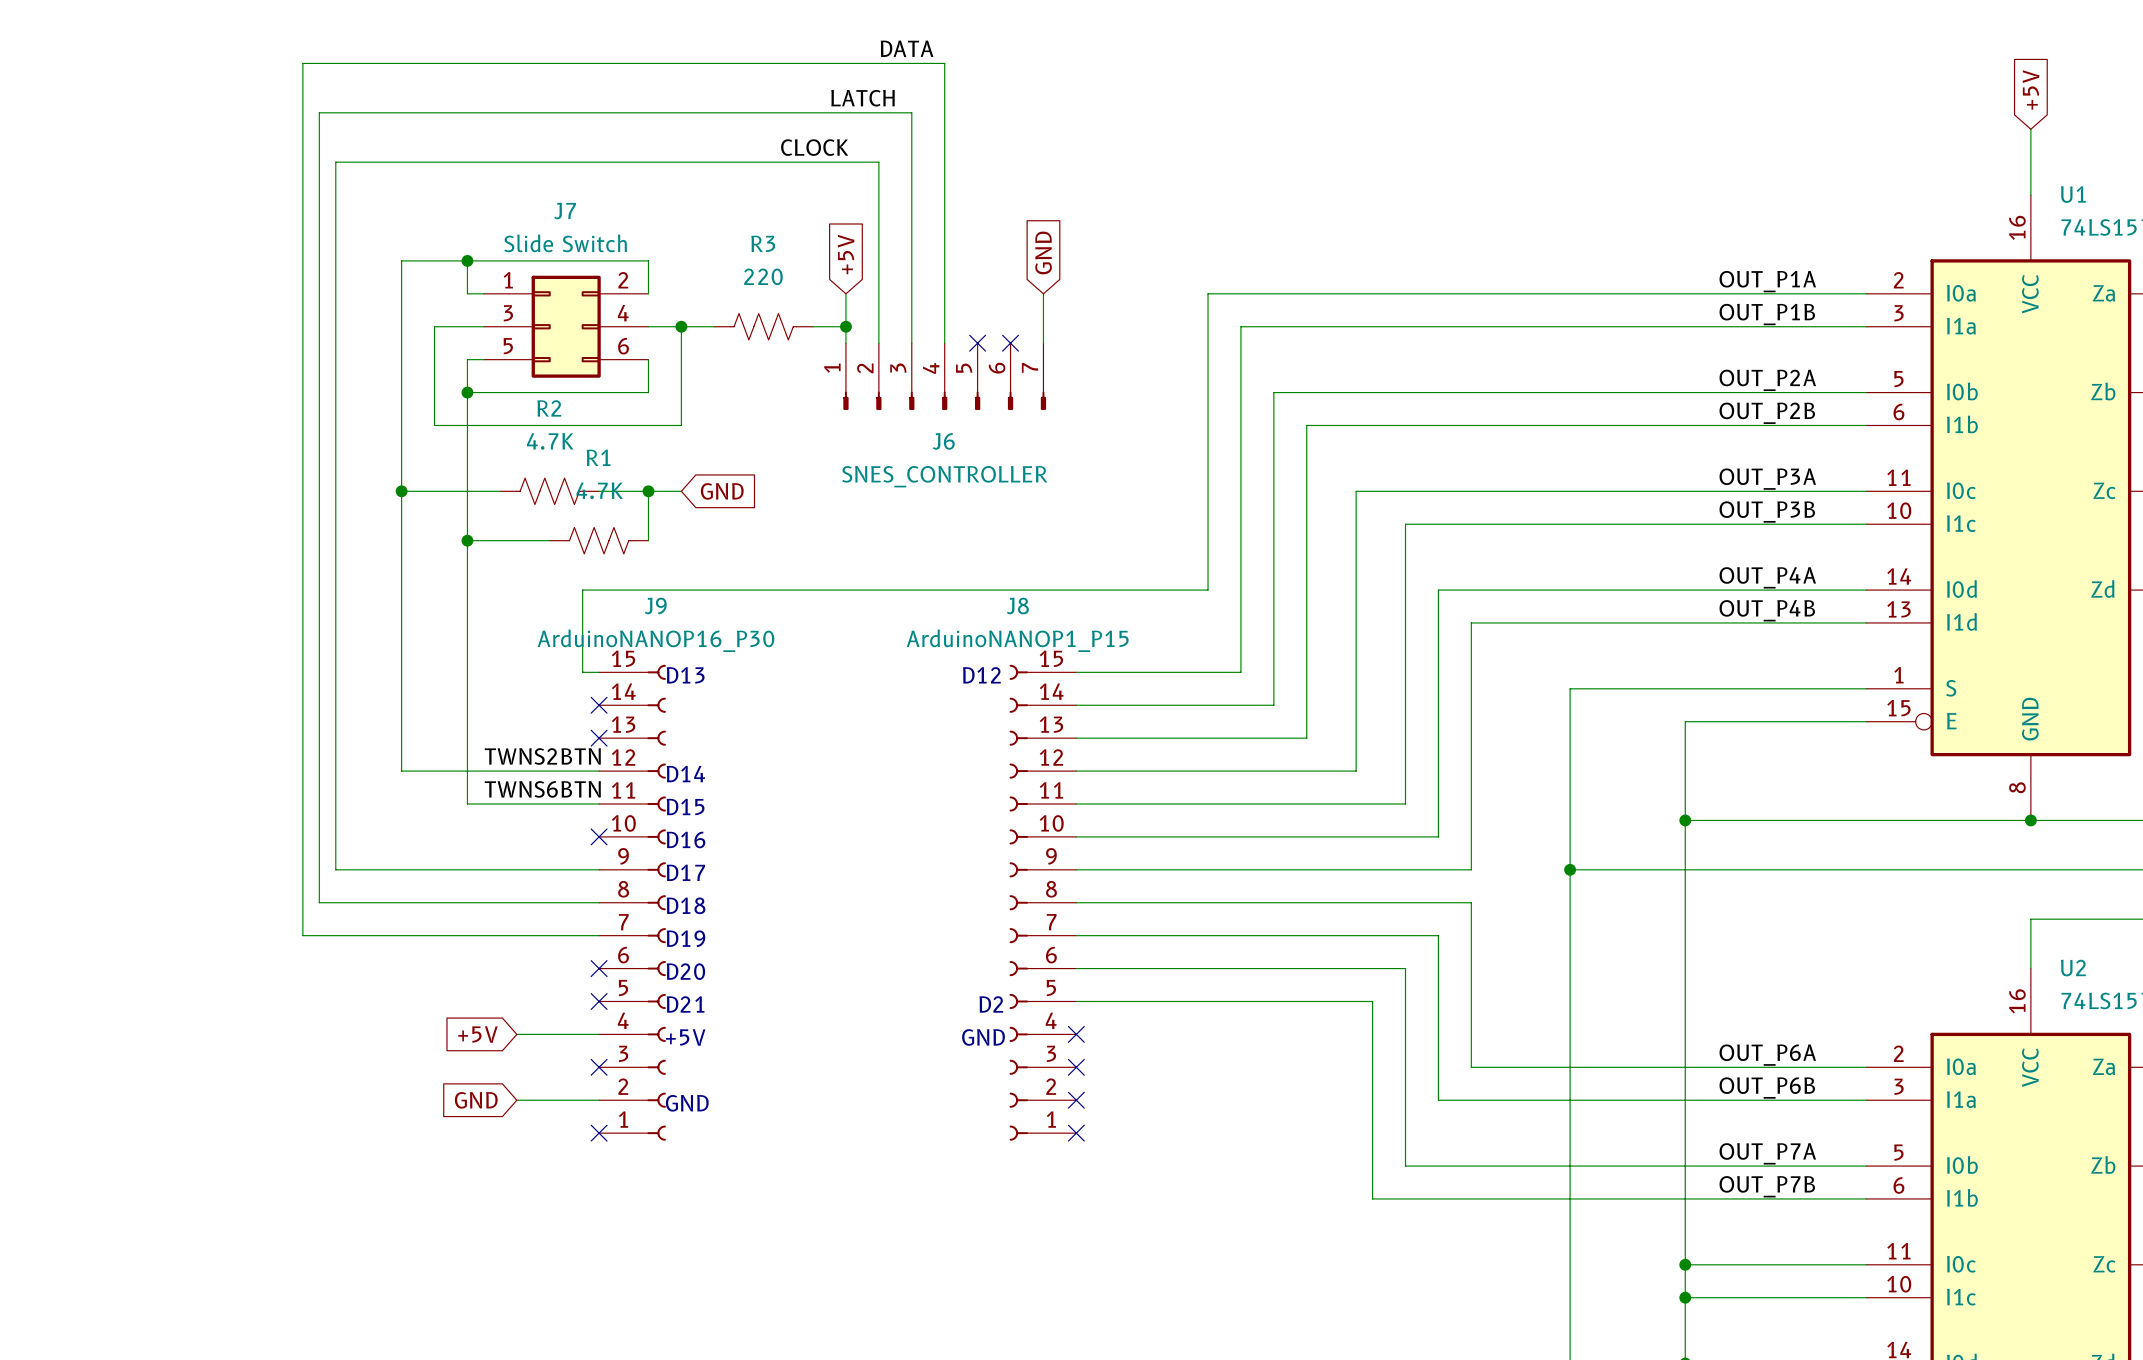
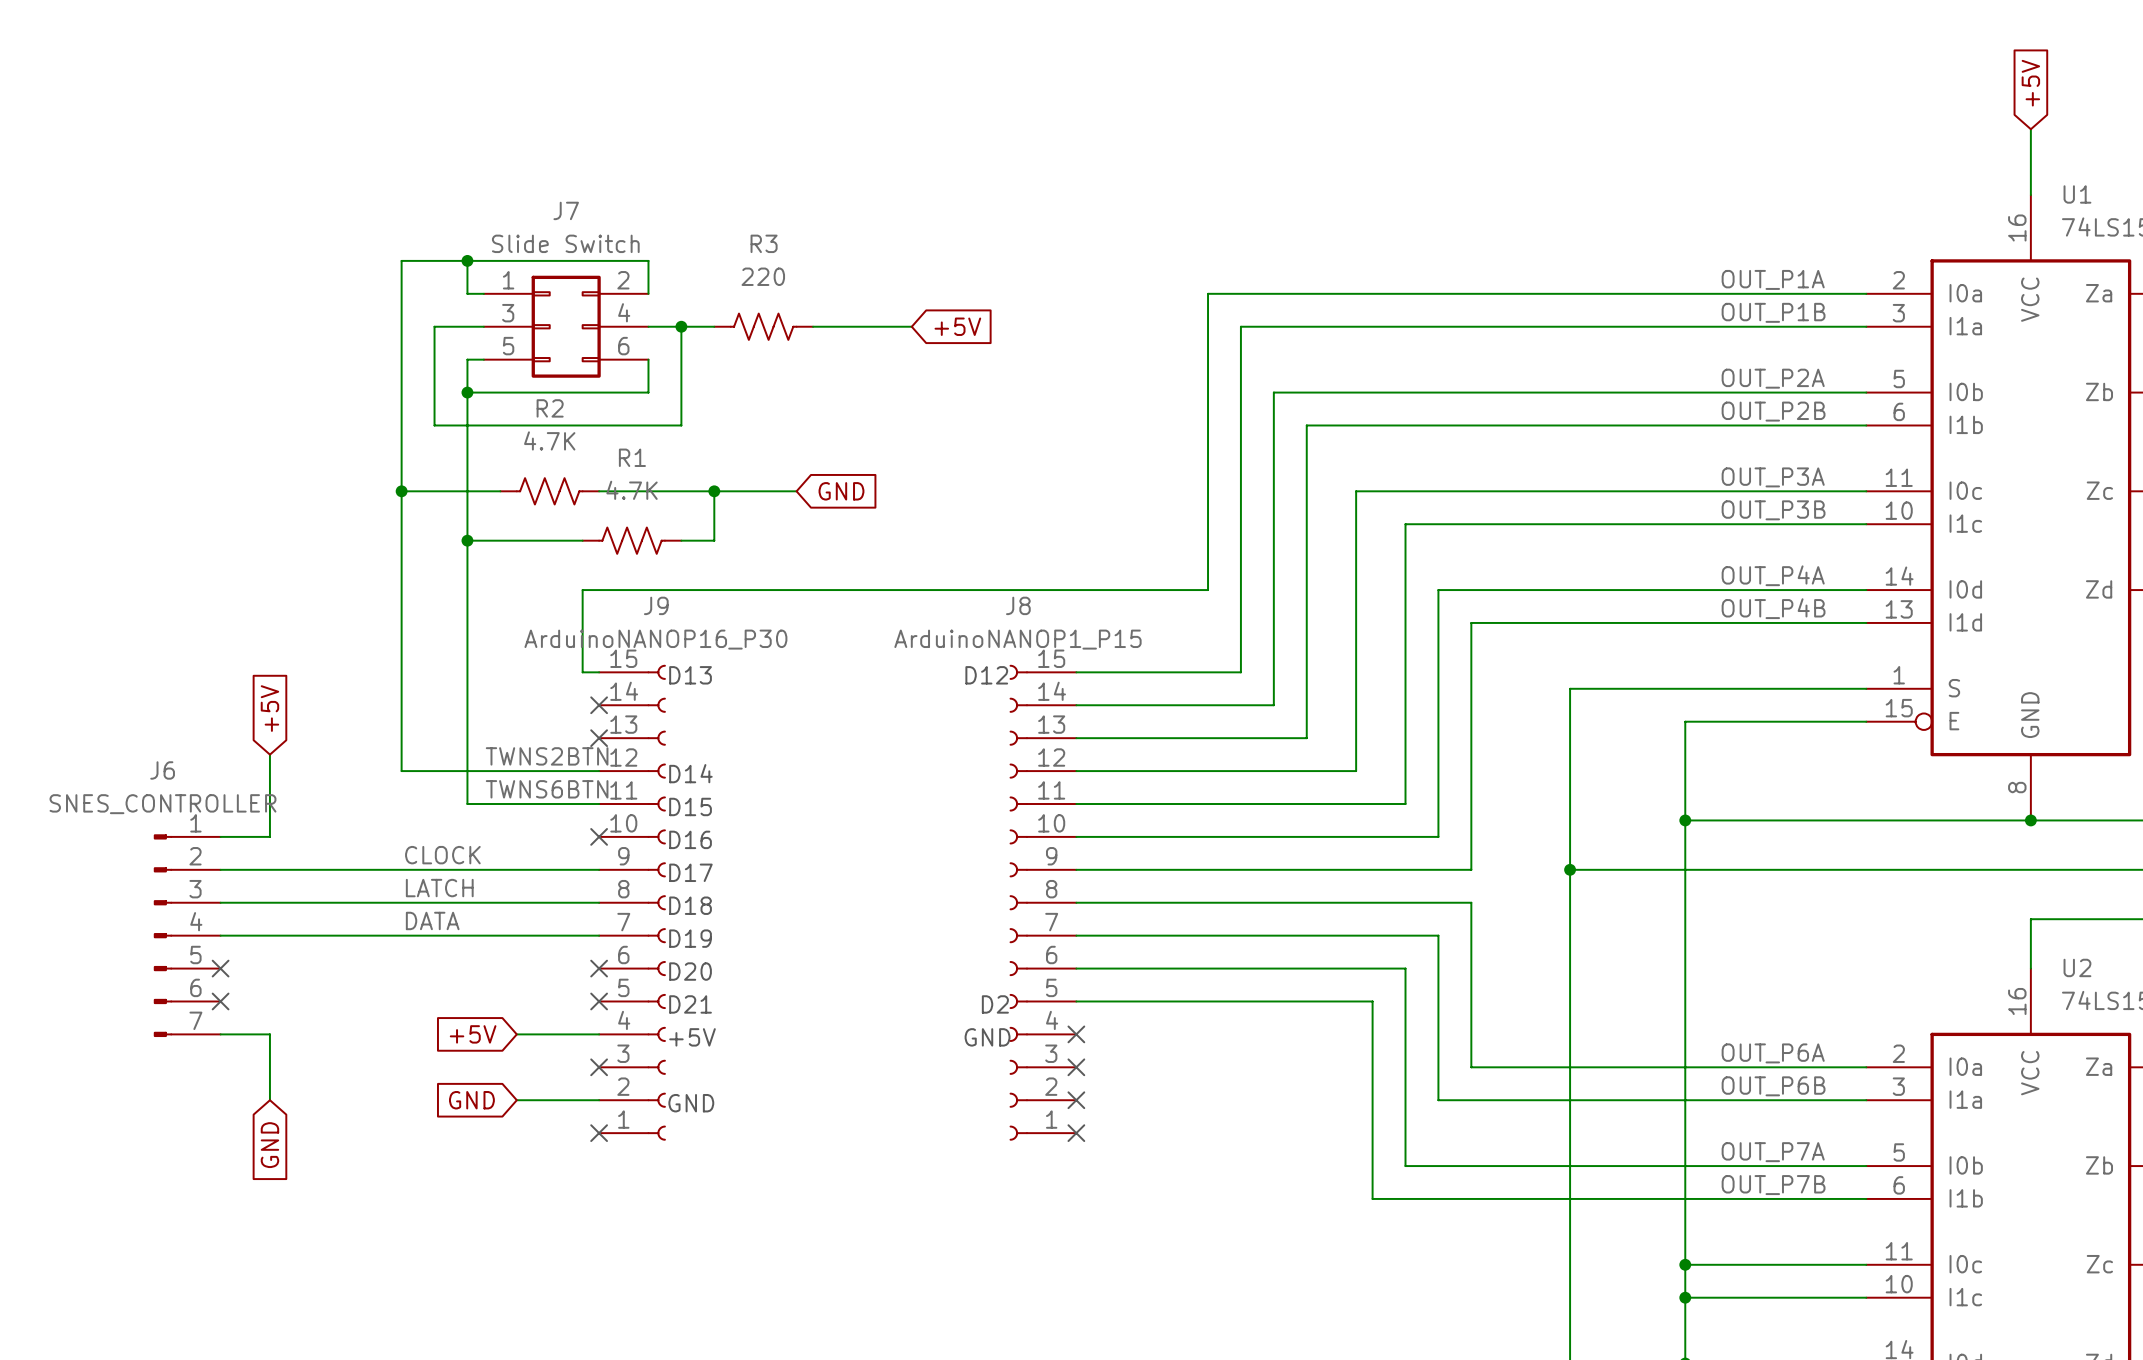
label: DATA (907, 48) -> none
label: LATCH (862, 98) -> none
label: CLOCK (814, 147) -> none
global label: GND (1043, 252) -> none
global label rotation: 0° (846, 254) -> 90° clockwise (957, 326)
global label position: +5V (846, 254) -> +5V (957, 326)
wire: (845, 293) (845, 343) -> none
wire: (1043, 293) (1043, 343) -> none
wire: none -> (845, 326) (911, 326)
junction: (845, 326) -> none
wire: (878, 343) (878, 162) (335, 162) (335, 869) -> (220, 869) (335, 869)
wire: (911, 343) (911, 112) (319, 112) (319, 902) -> (220, 902) (319, 902)
wire: (944, 343) (944, 63) (302, 63) (302, 935) -> (220, 935) (302, 935)
no-connect mark: (977, 343) -> none
no-connect mark: (1010, 343) -> none
J6 position: (944, 376) -> (187, 935)
J6 rotation: 0° (944, 400) -> 90° clockwise (162, 935)
J6 name position: J6 (943, 441) -> J6 (162, 770)
J6 value position: SNES_CONTROLLER (944, 476) -> SNES_CONTROLLER (162, 804)
wire: (648, 491) (648, 540) -> none
junction position: (648, 491) -> (714, 491)
wire: none -> (681, 491) (796, 491)
wire: none -> (714, 491) (714, 540) (681, 540)
global label position: GND (722, 491) -> GND (841, 491)
R1 position: (599, 540) -> (632, 540)
global label: none -> +5V (269, 708)
wire: none -> (269, 754) (269, 836) (220, 836)
label: none -> CLOCK (442, 855)
label: none -> LATCH (439, 888)
label: none -> DATA (432, 920)
no-connect mark: none -> (220, 968)
no-connect mark: none -> (220, 1001)
wire: none -> (220, 1034) (269, 1034) (269, 1100)
global label: none -> GND (269, 1145)

